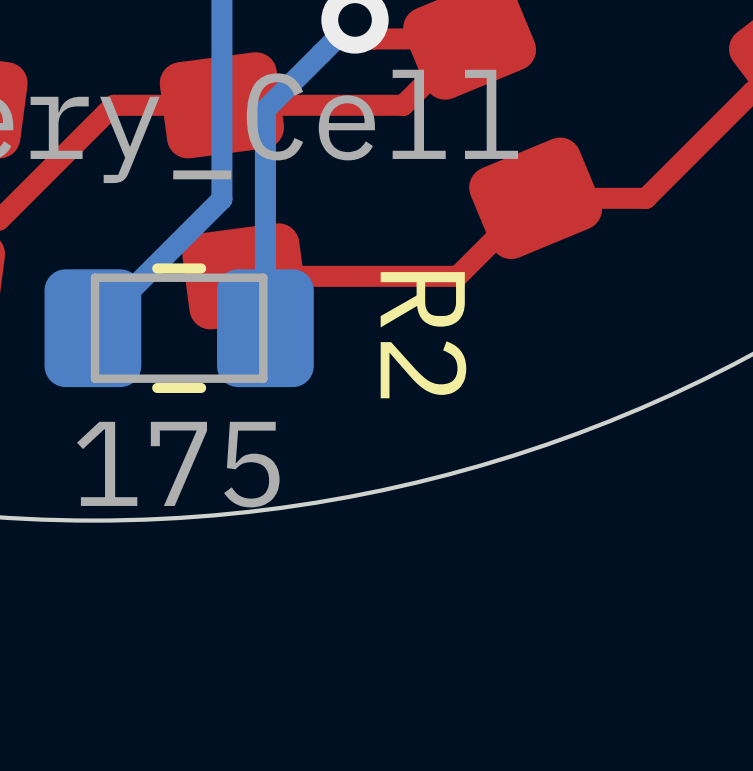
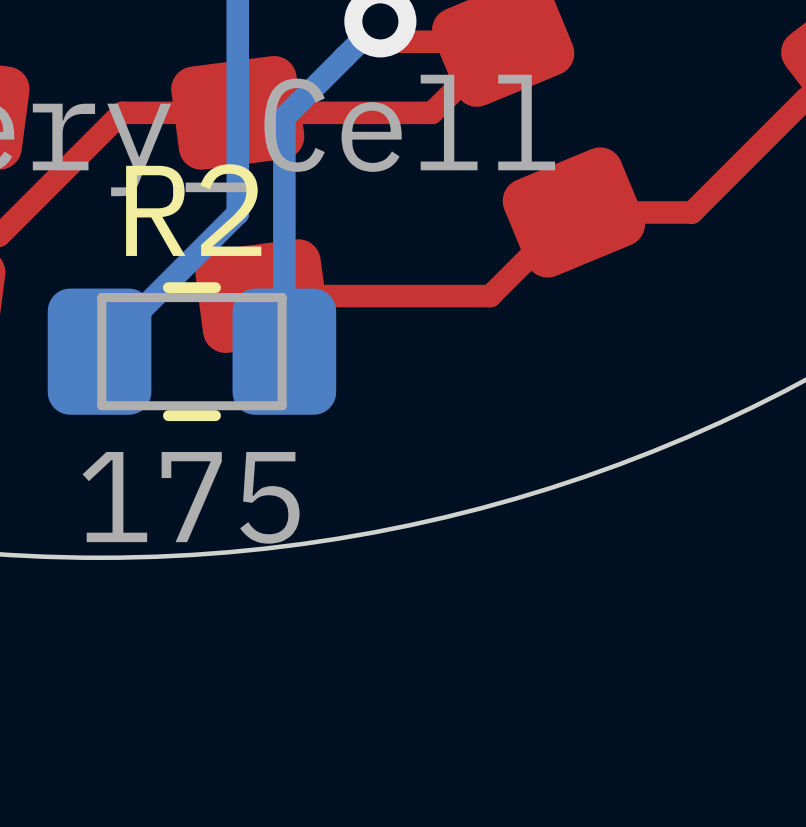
R2 name rotation: 0° (423, 335) -> 90° counterclockwise (193, 210)
R2 name position: R2 (423, 335) -> R2 (193, 210)

